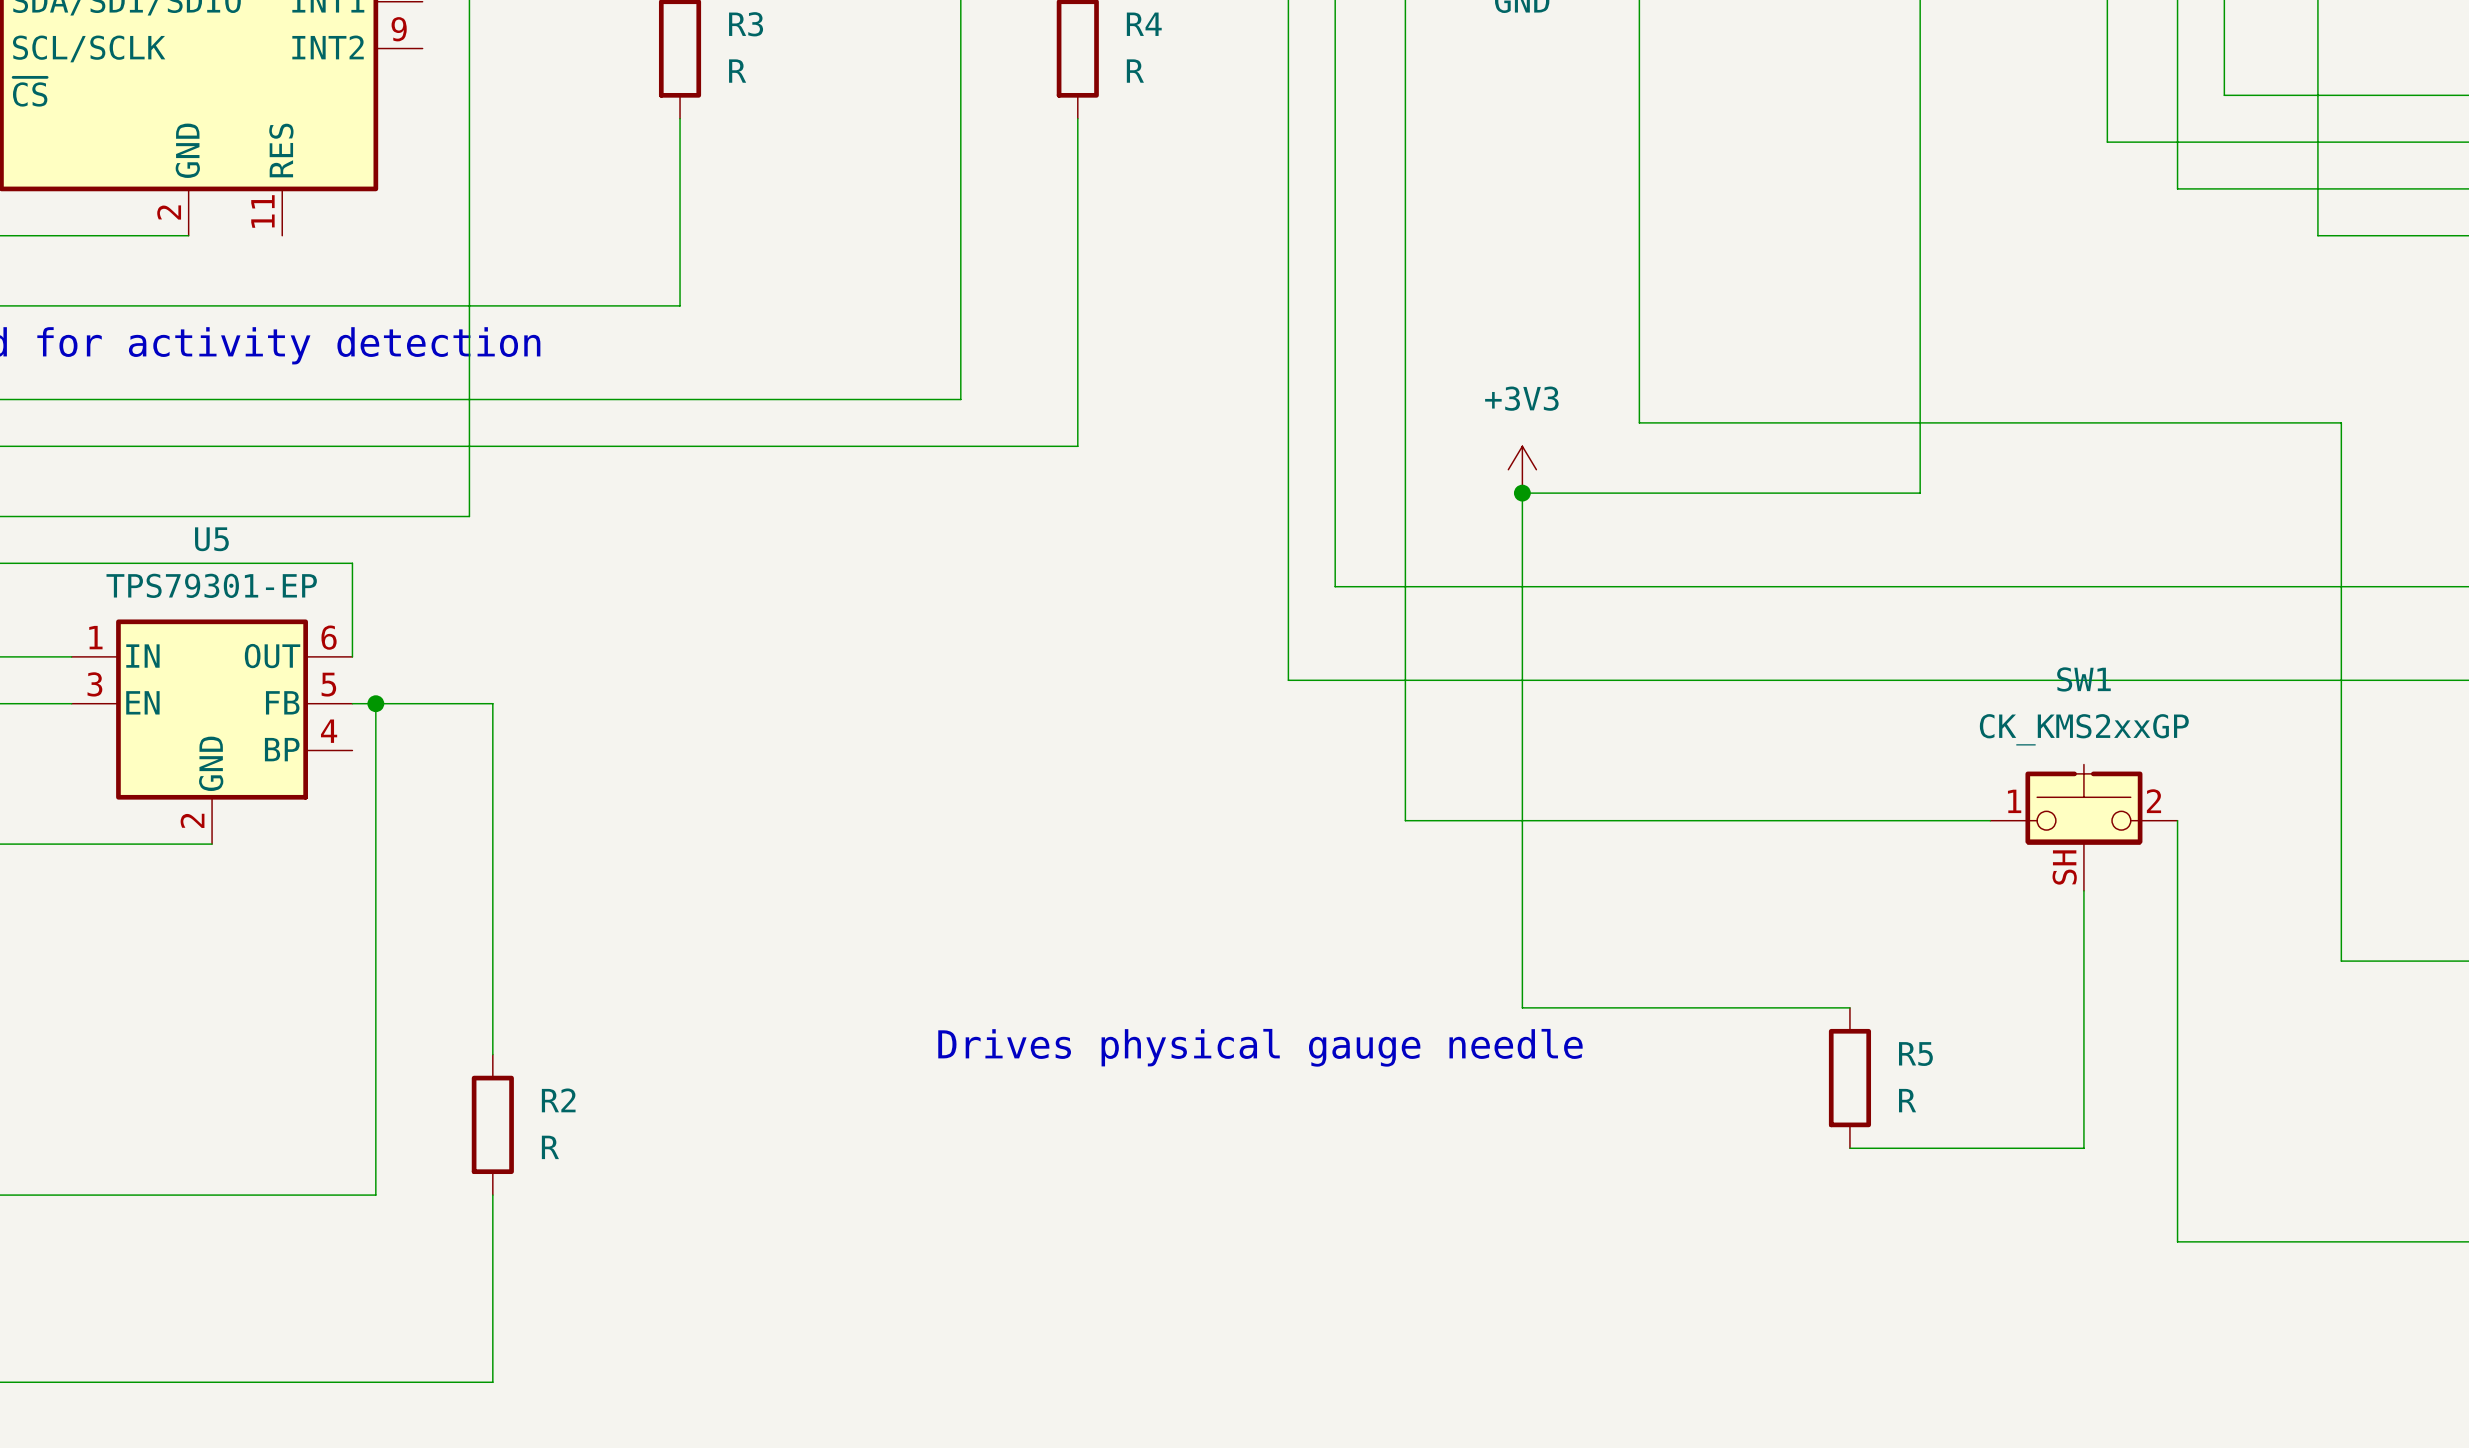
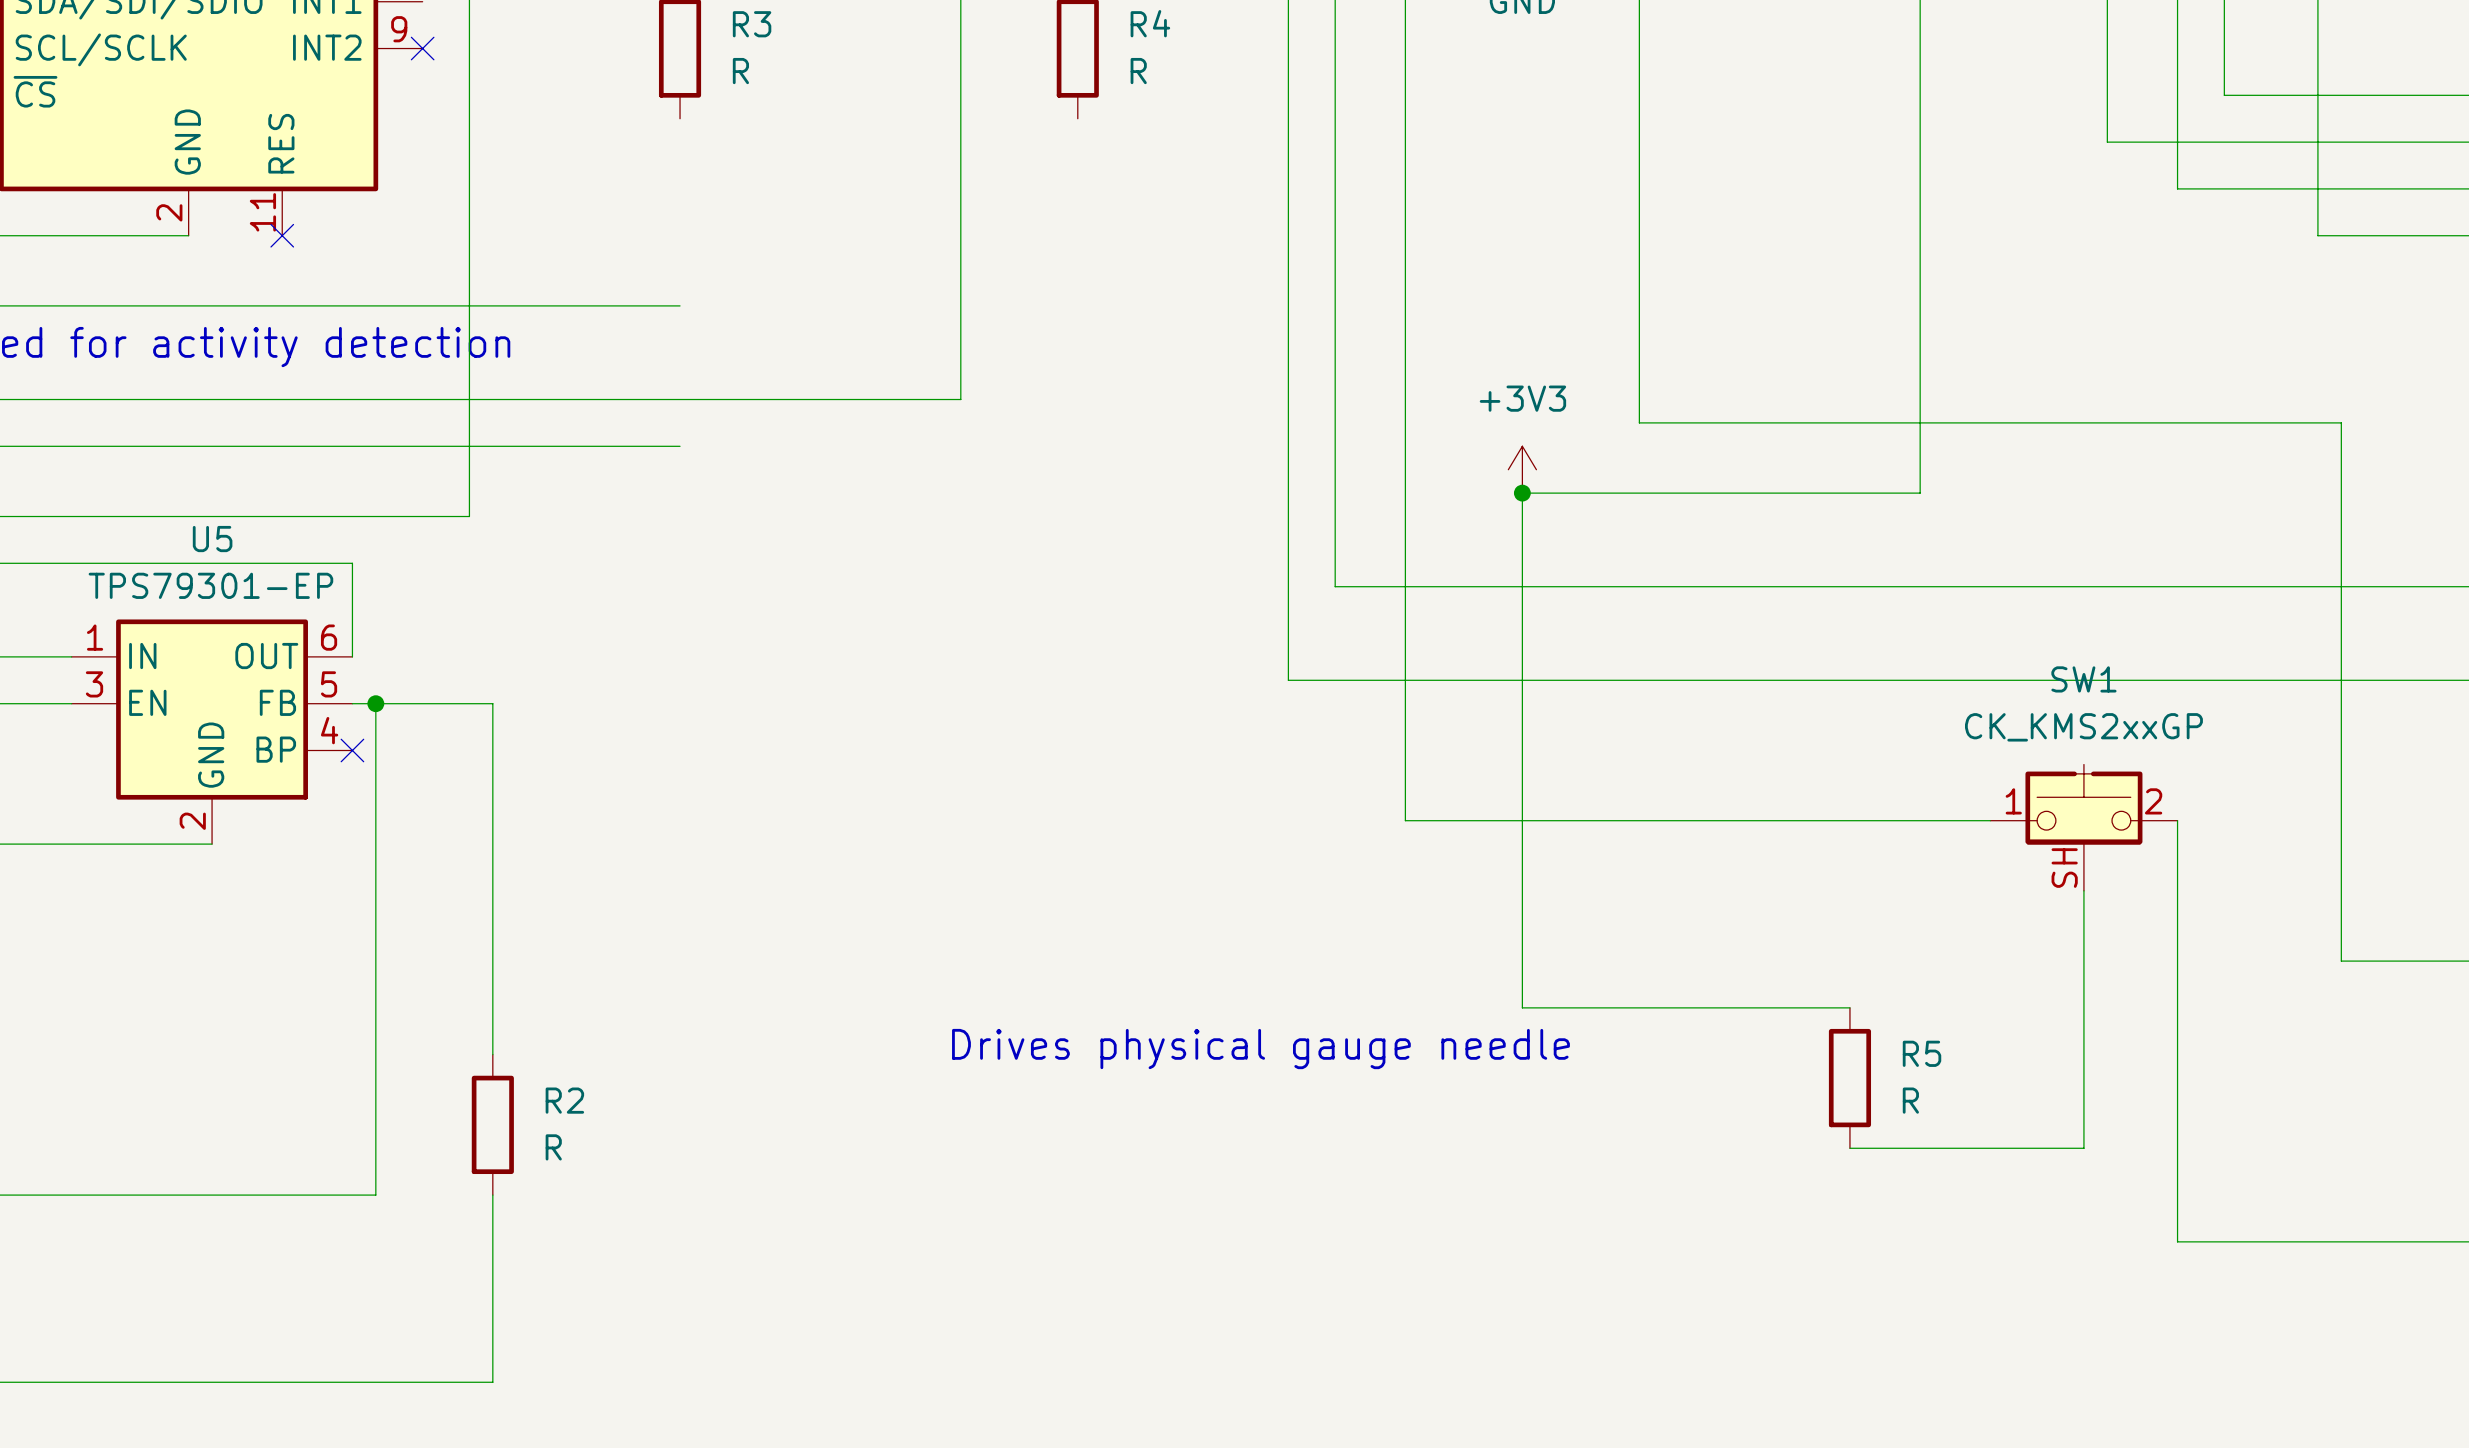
no-connect mark: none -> (422, 48)
wire: (680, 118) (680, 305) -> none
wire: (1077, 118) (1077, 446) (680, 446) -> none
no-connect mark: none -> (282, 235)
no-connect mark: none -> (352, 750)

